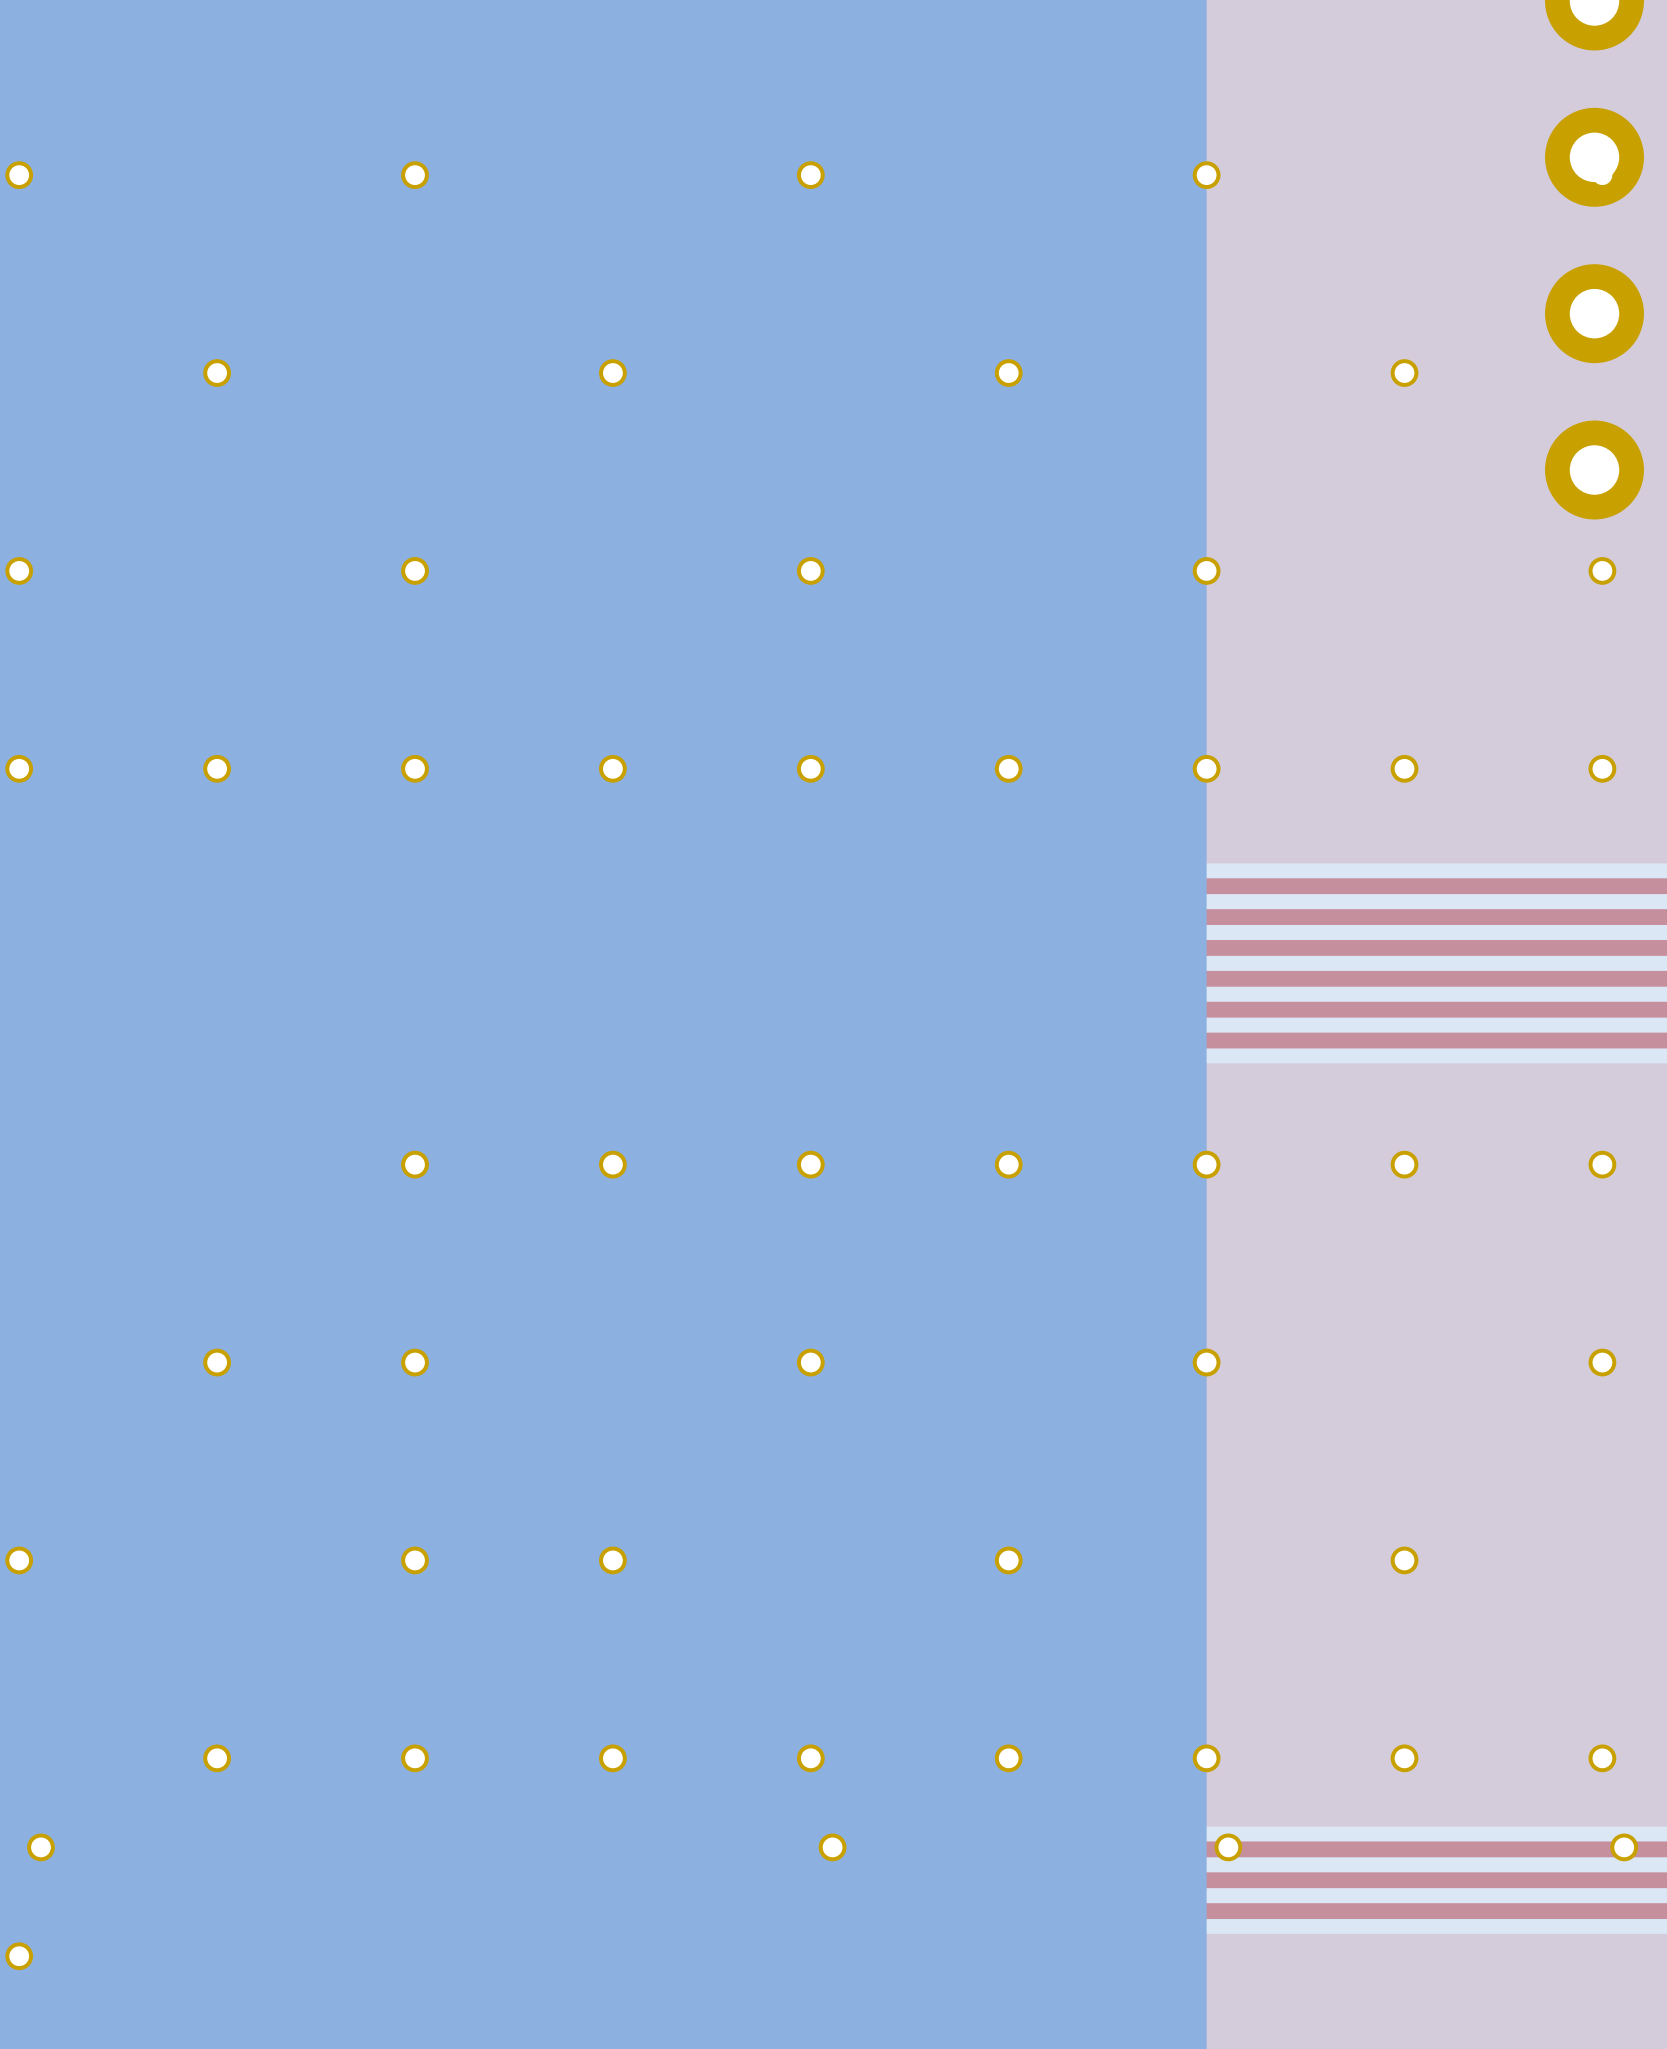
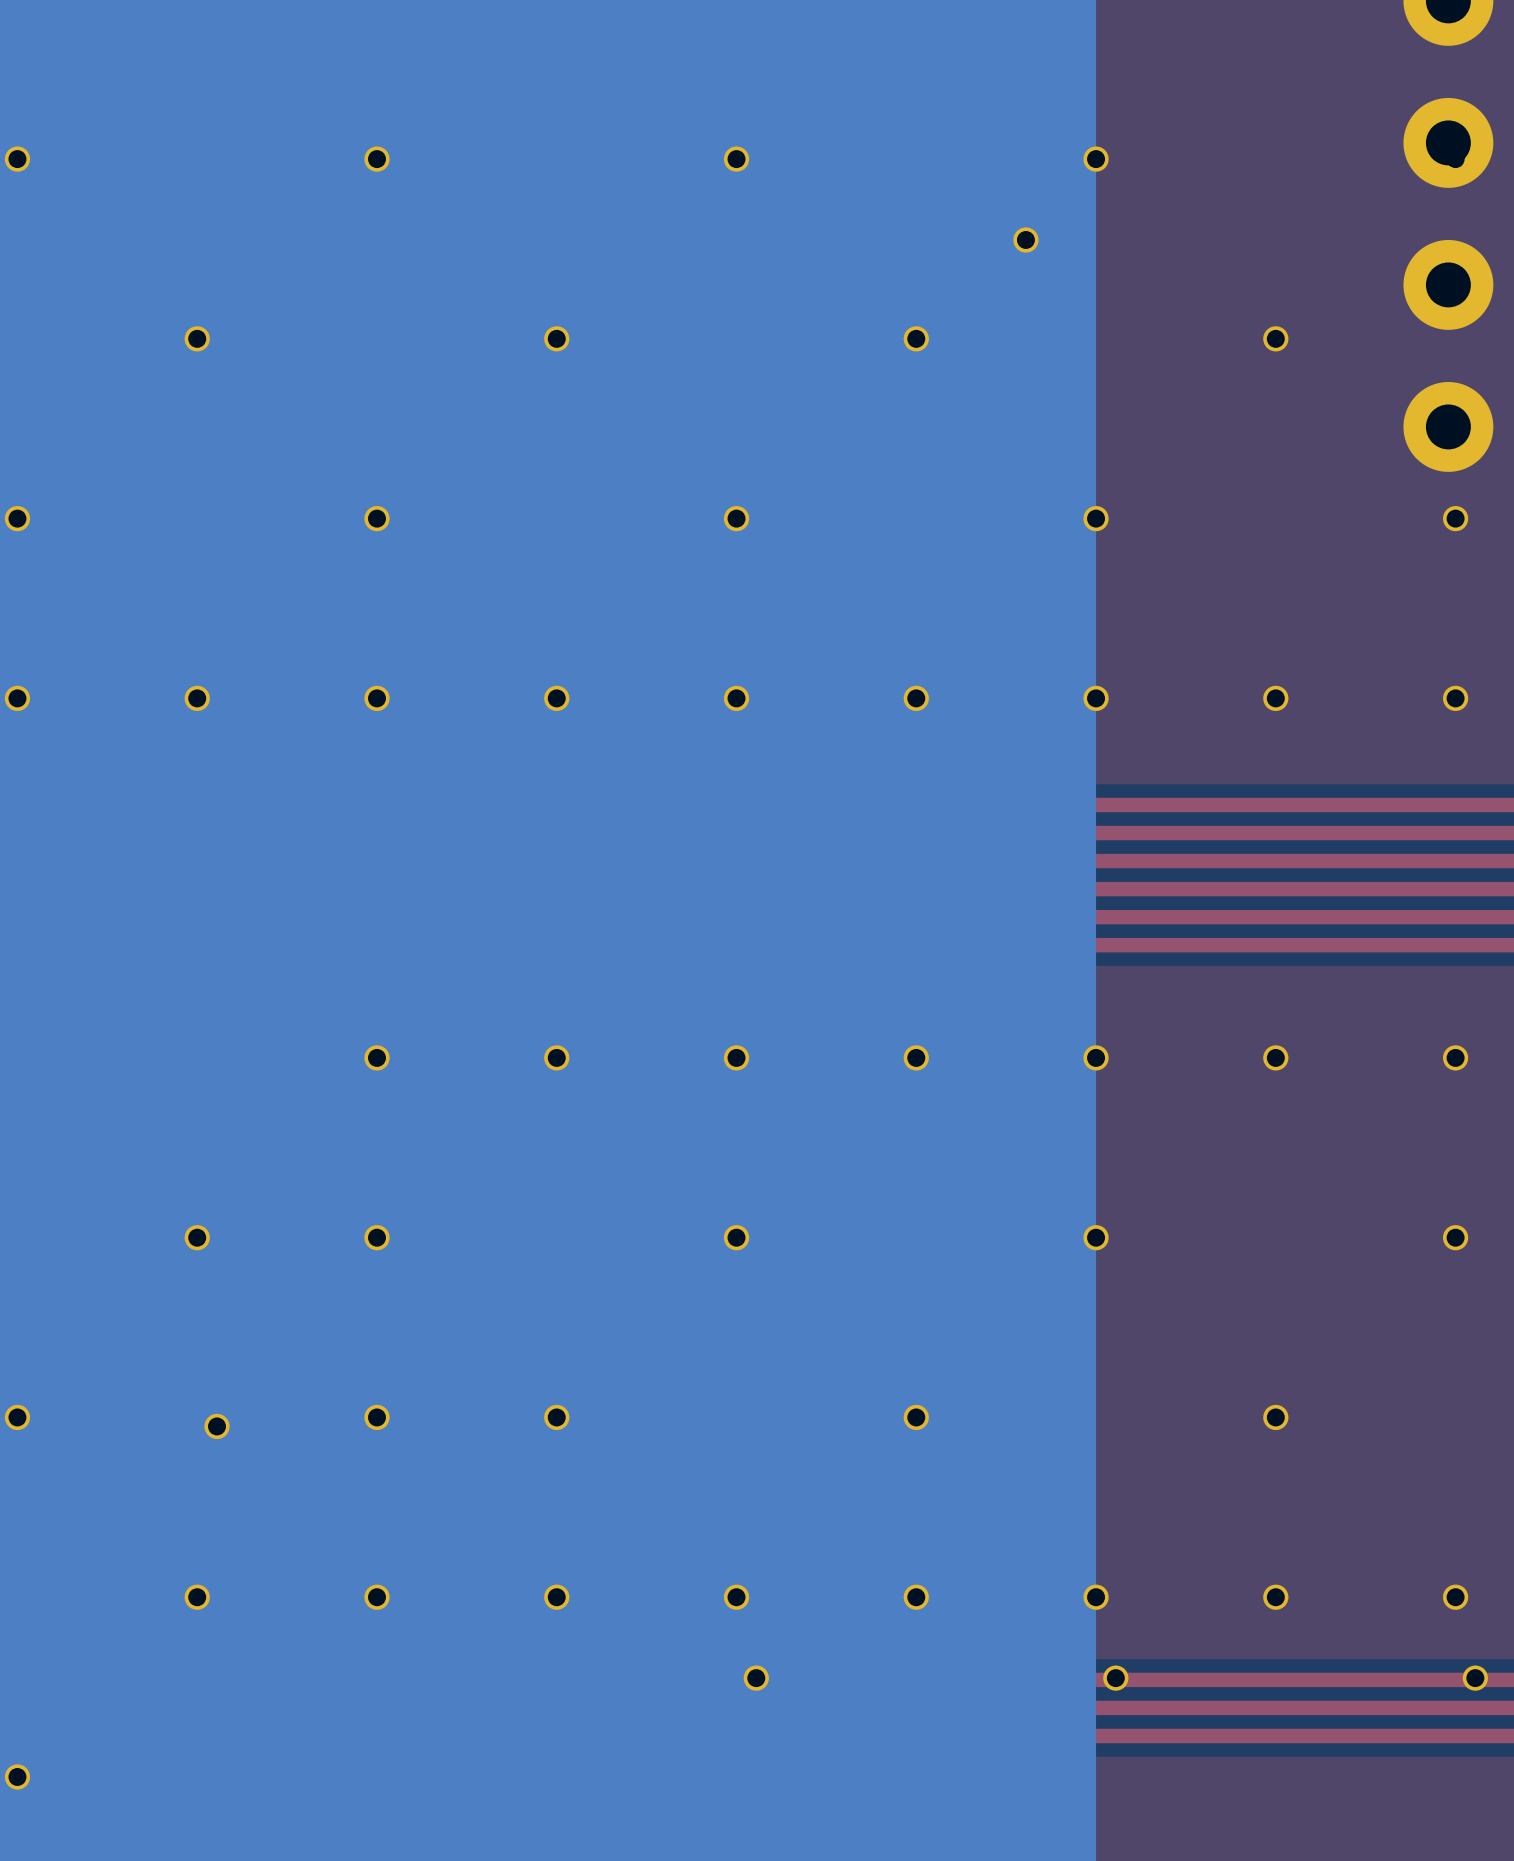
part: none -> (1025, 239)
part position: (40, 1847) -> (216, 1426)

